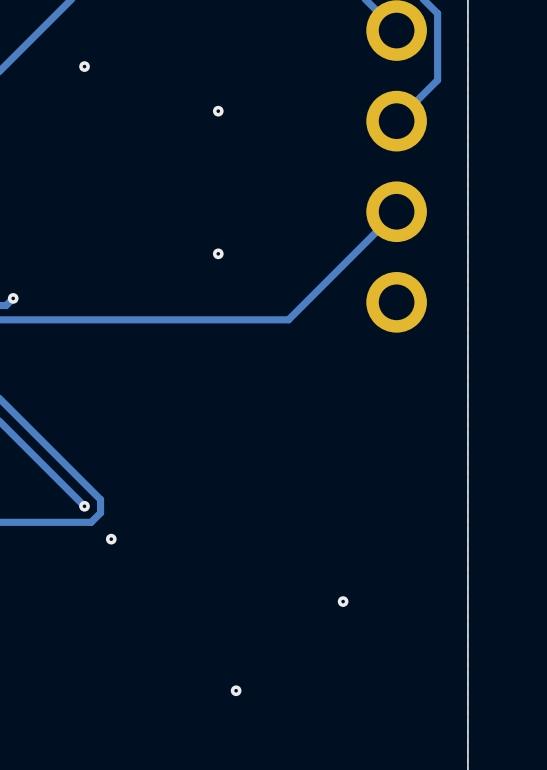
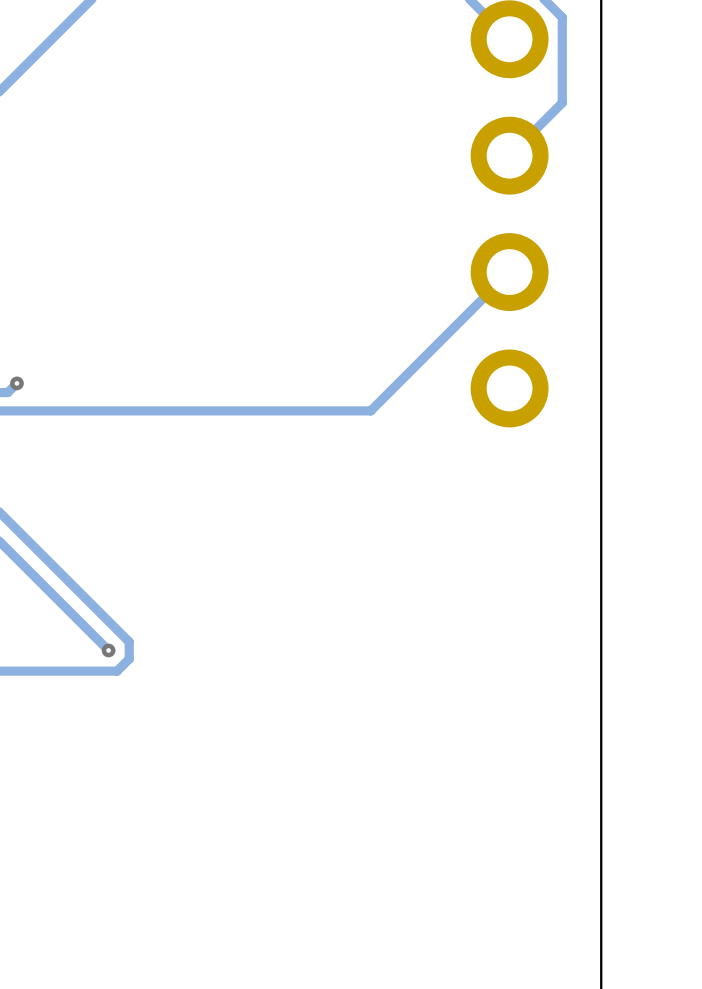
via: (84, 66) -> none
via: (218, 111) -> none
via: (218, 253) -> none
via: (111, 539) -> none
via: (343, 601) -> none
via: (236, 690) -> none

